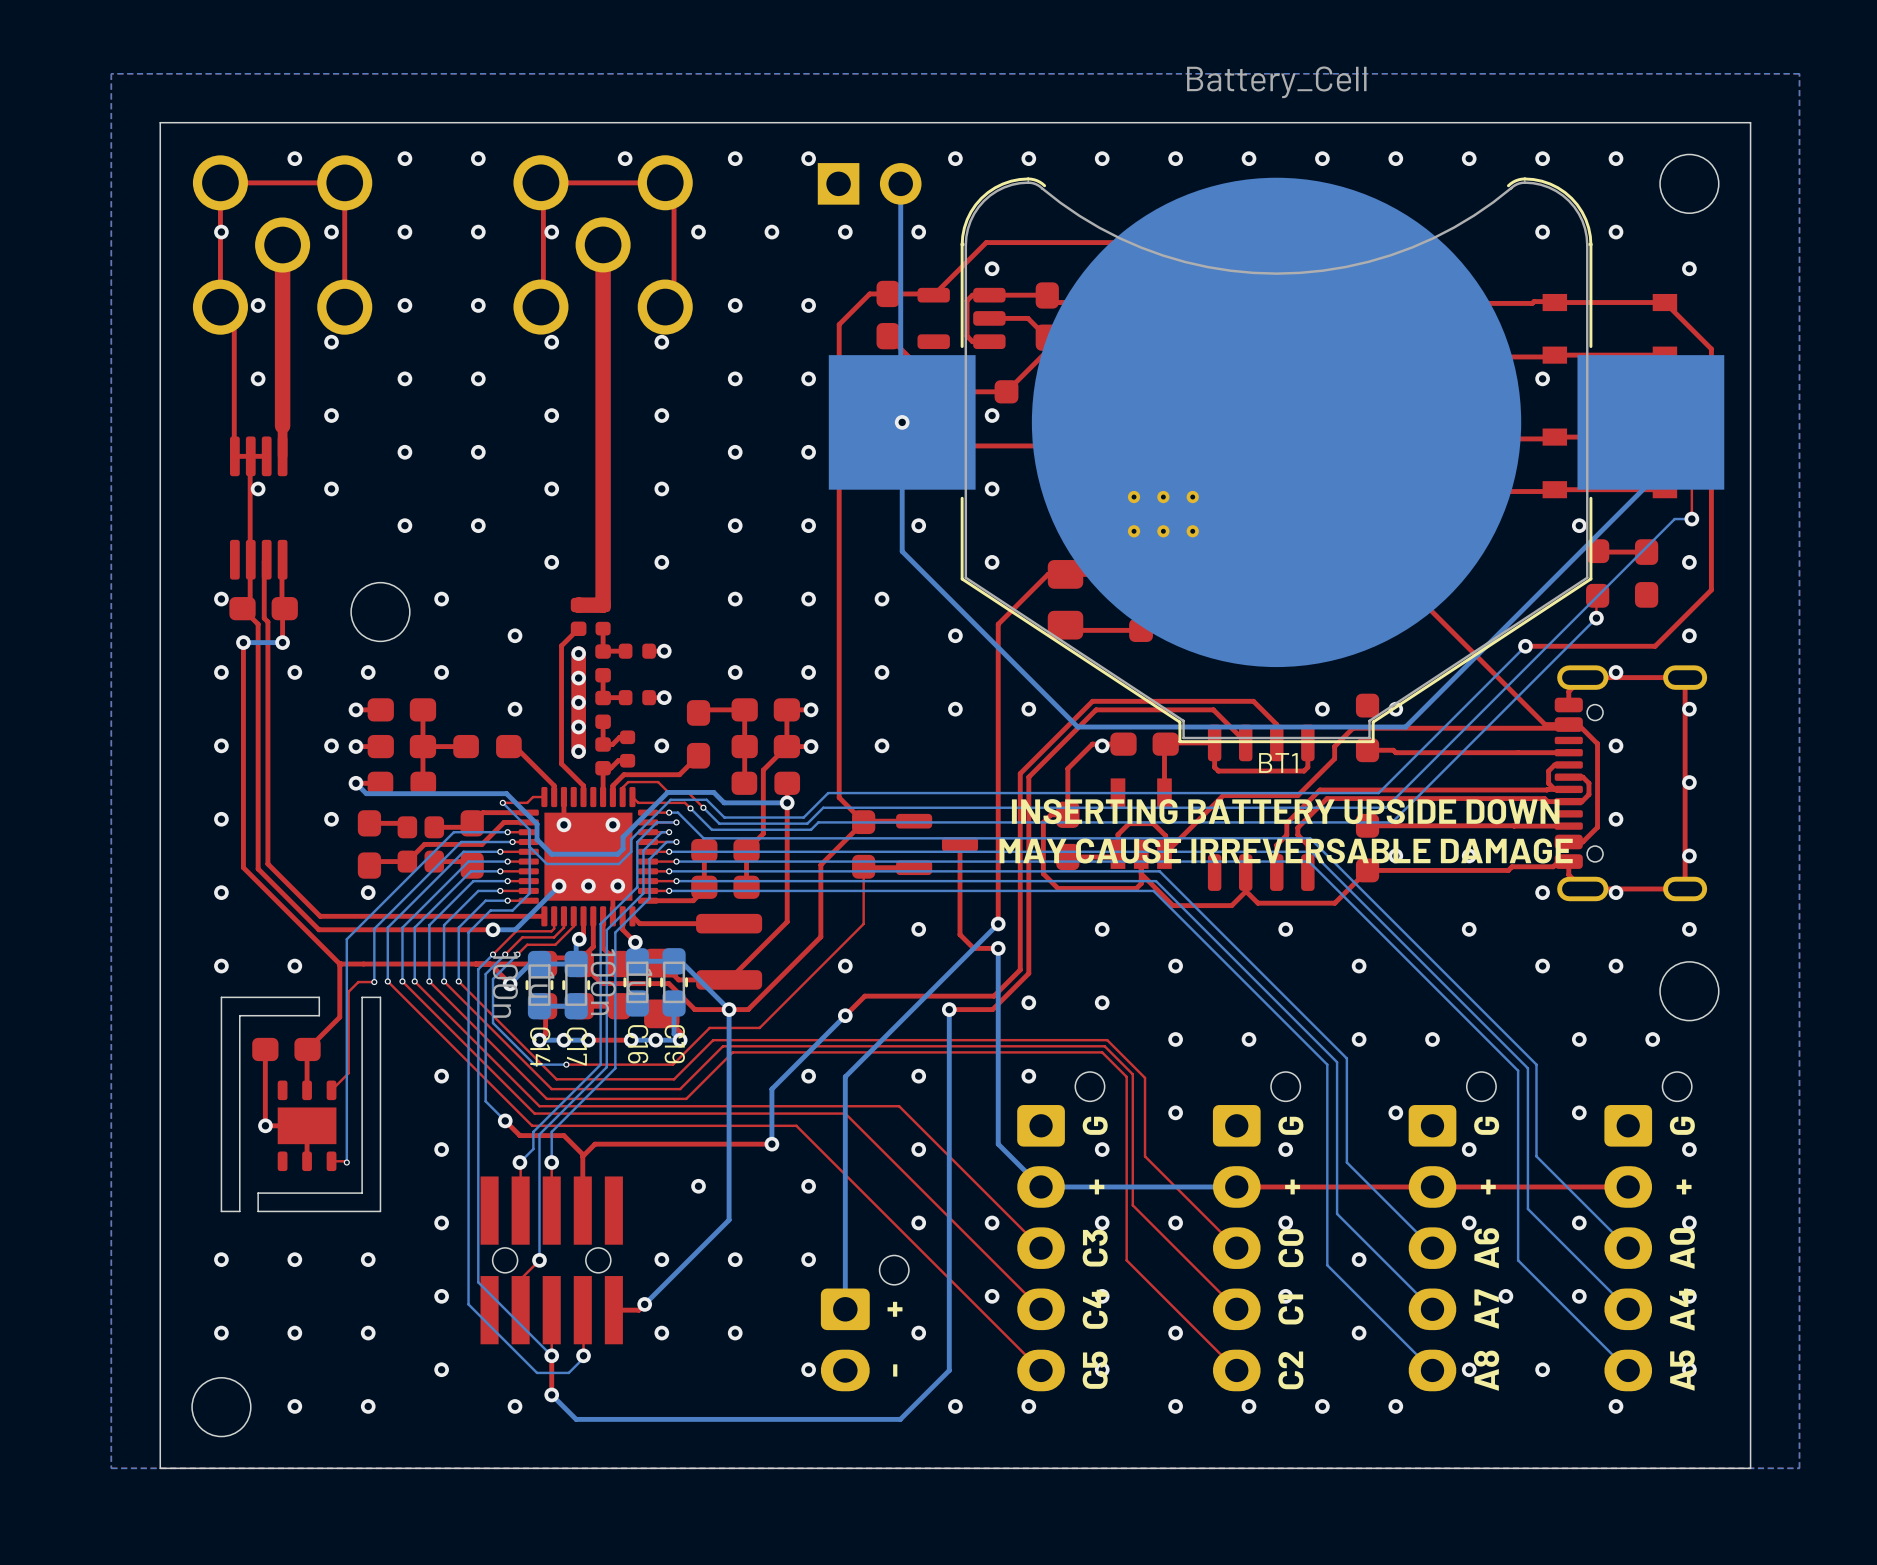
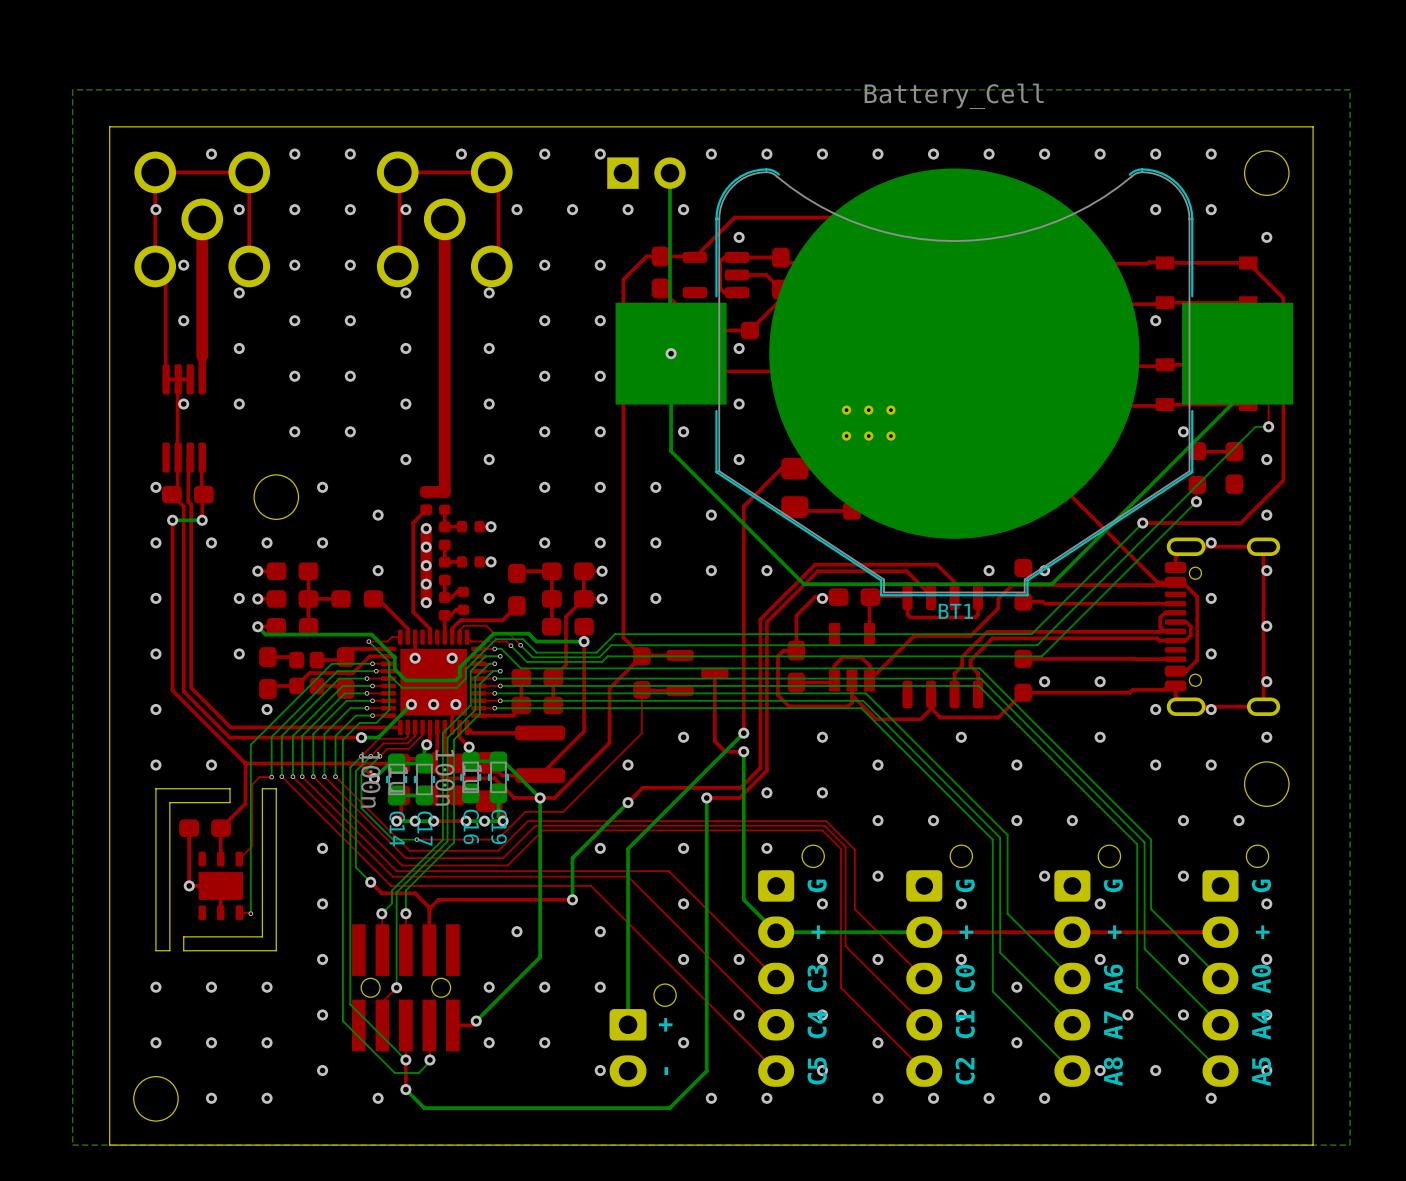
text: INSERTING BATTERY UPSIDE DOWN (1285, 811) -> none
text: MAY CAUSE IRREVERSABLE DAMAGE (1286, 850) -> none

